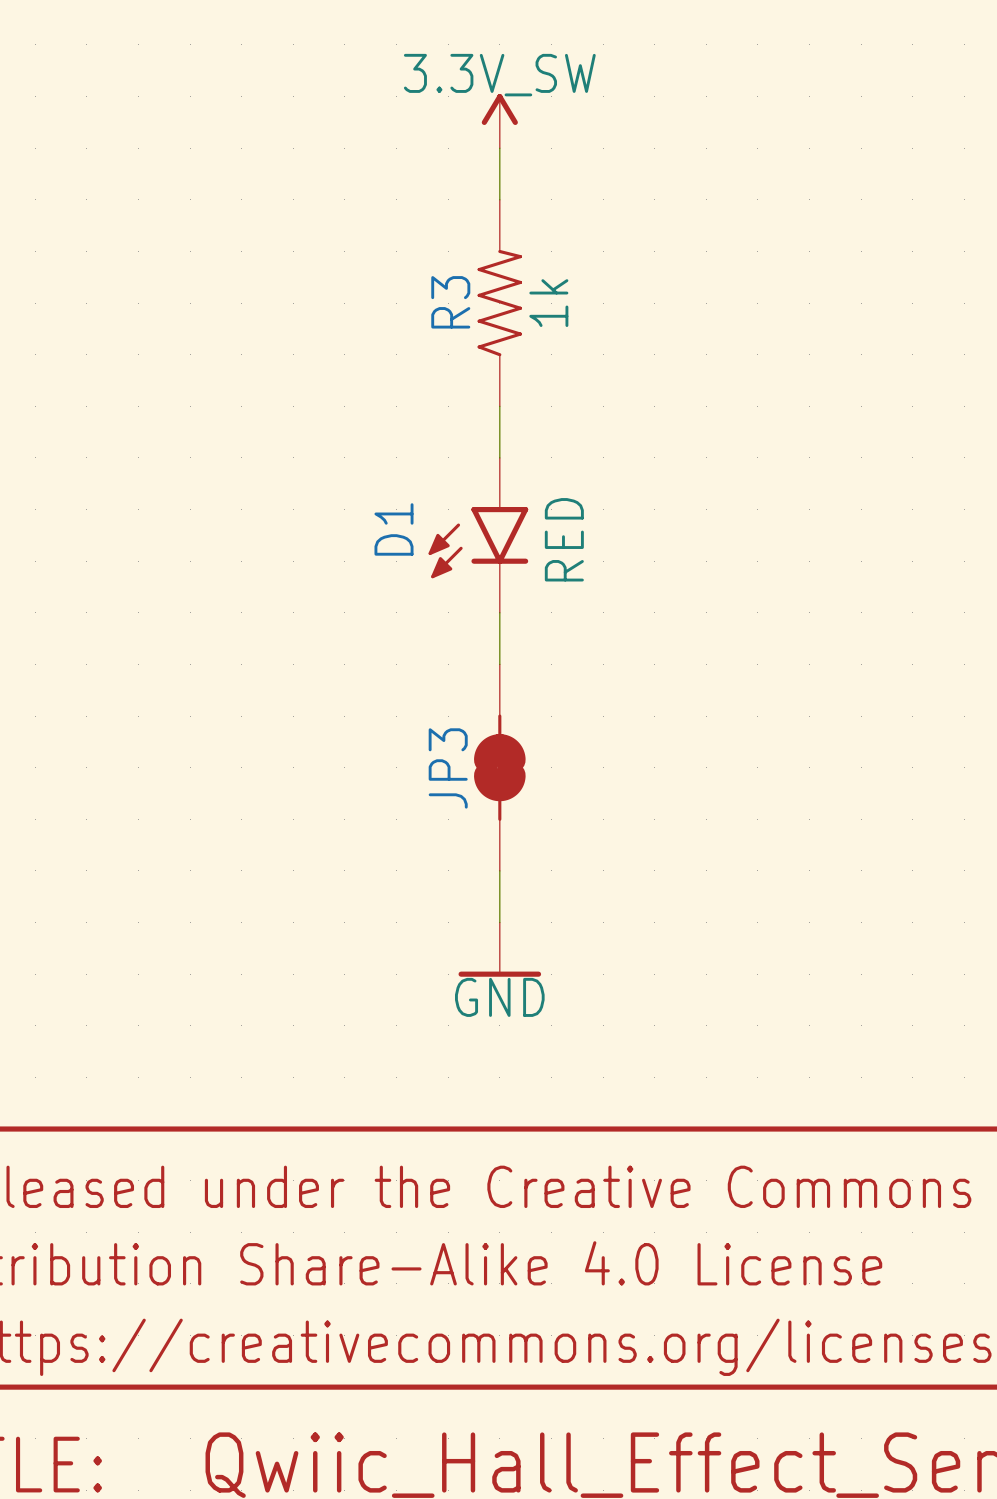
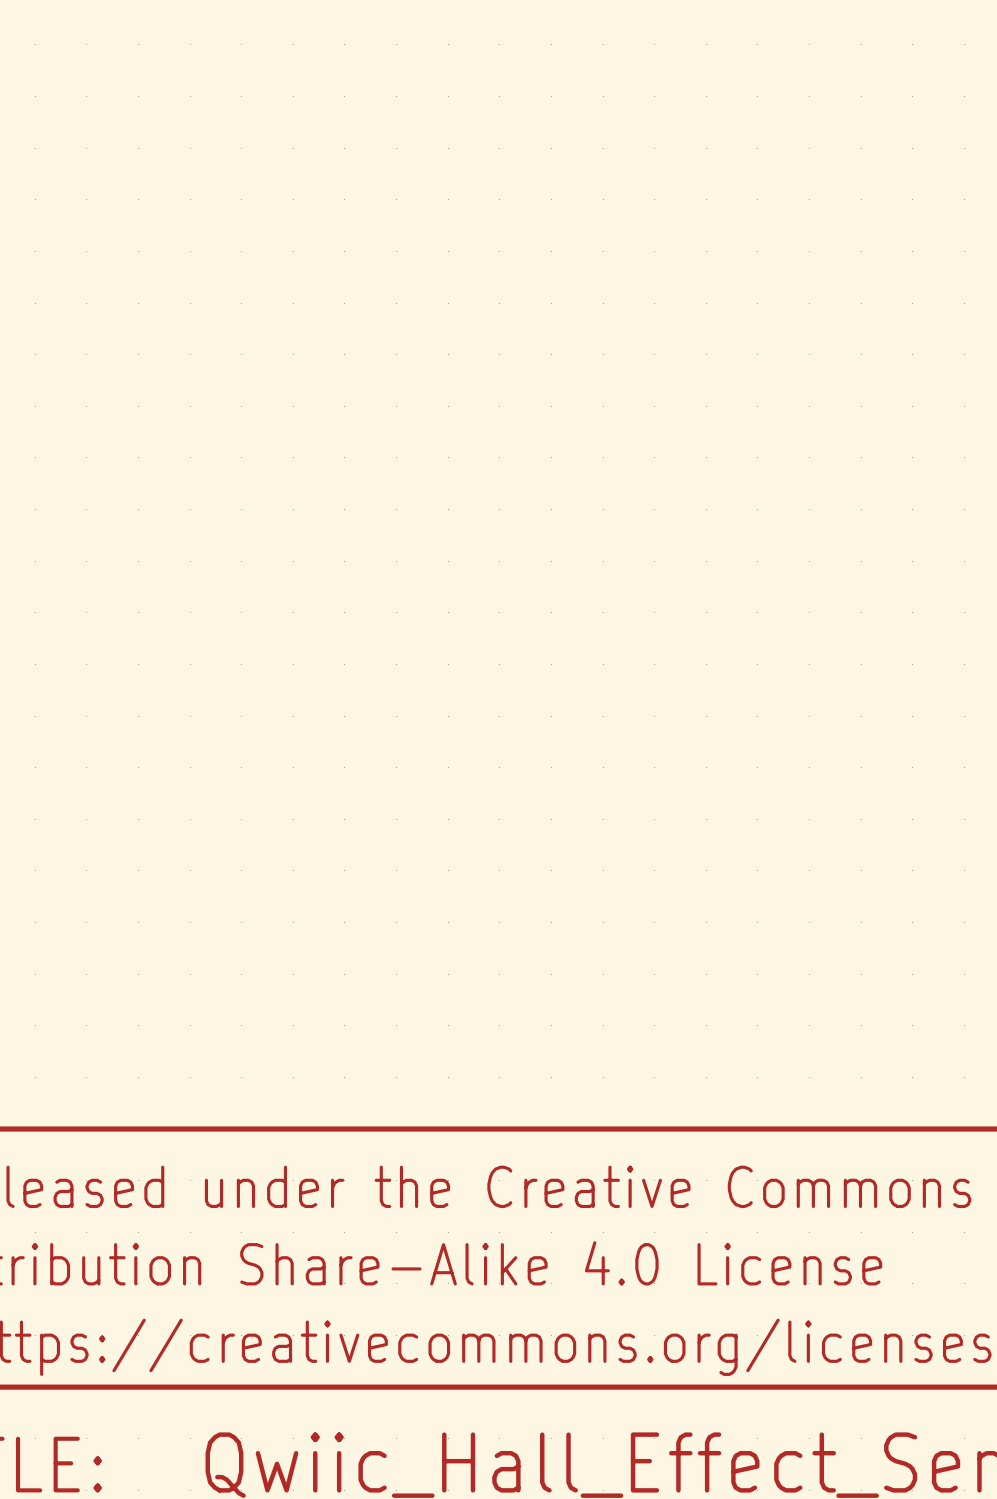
power symbol: 3.3V_SW (499, 121) -> none
wire: (499, 148) (499, 199) -> none
R3: 1k (499, 303) -> none
wire: (499, 406) (499, 457) -> none
D1: RED (478, 535) -> none
wire: (499, 612) (499, 664) -> none
JP3: (499, 767) -> none
wire: (499, 870) (499, 922) -> none
power symbol: GND (499, 949) -> none

